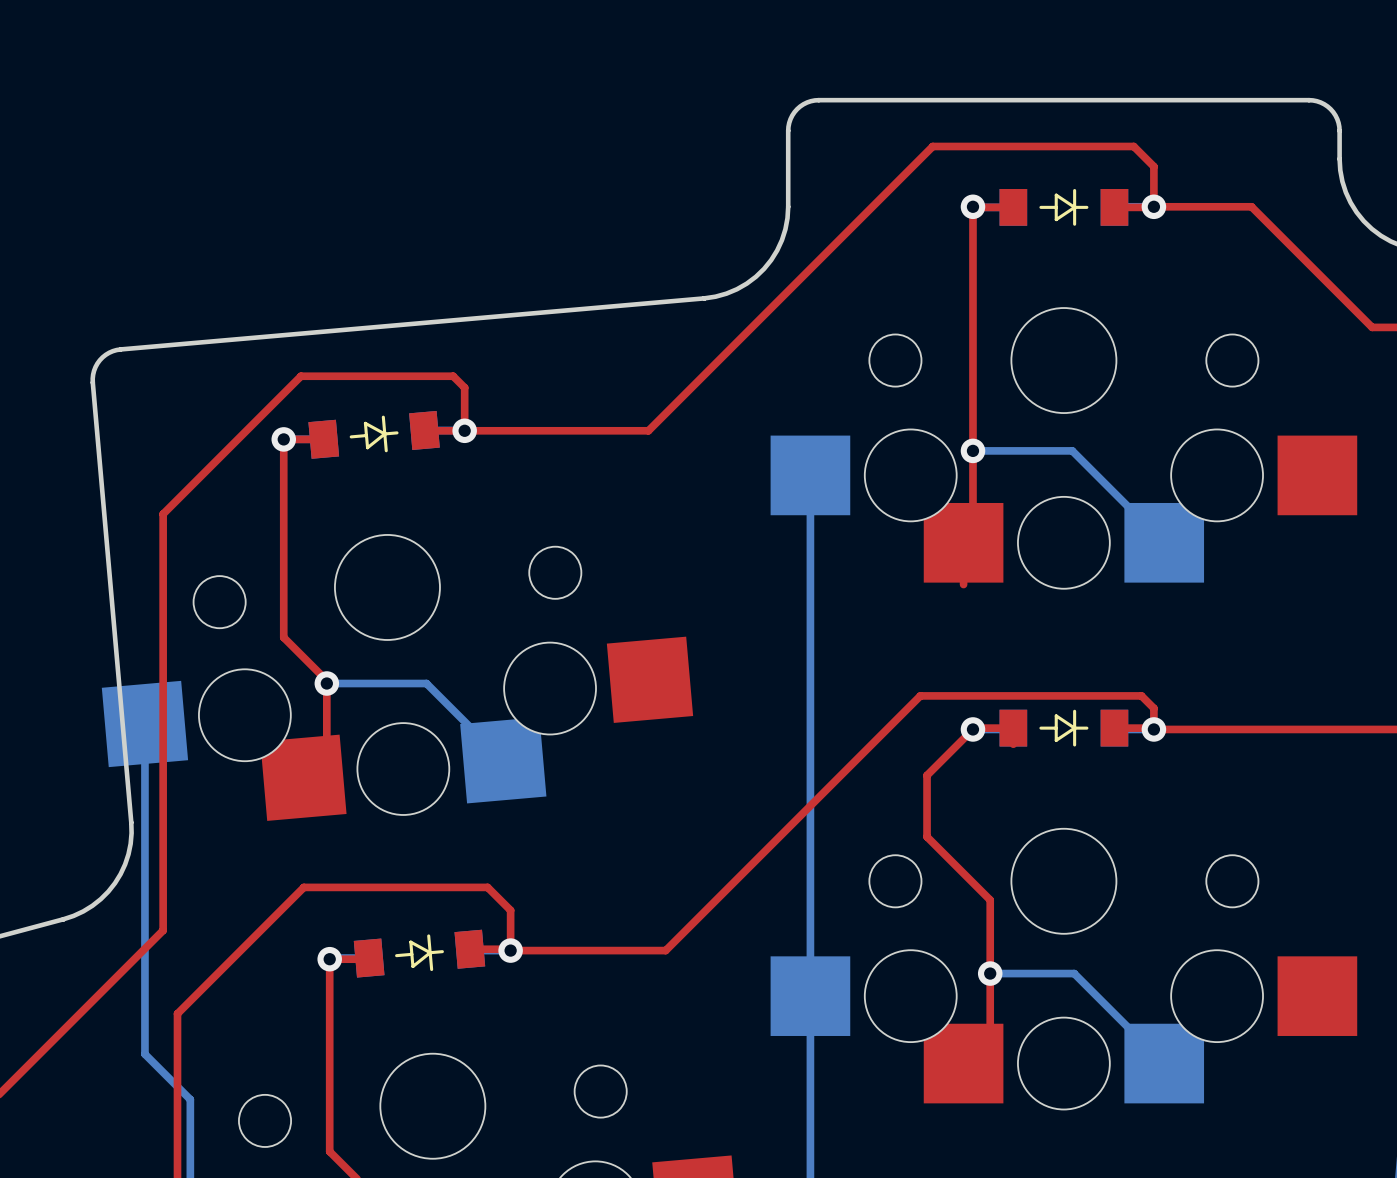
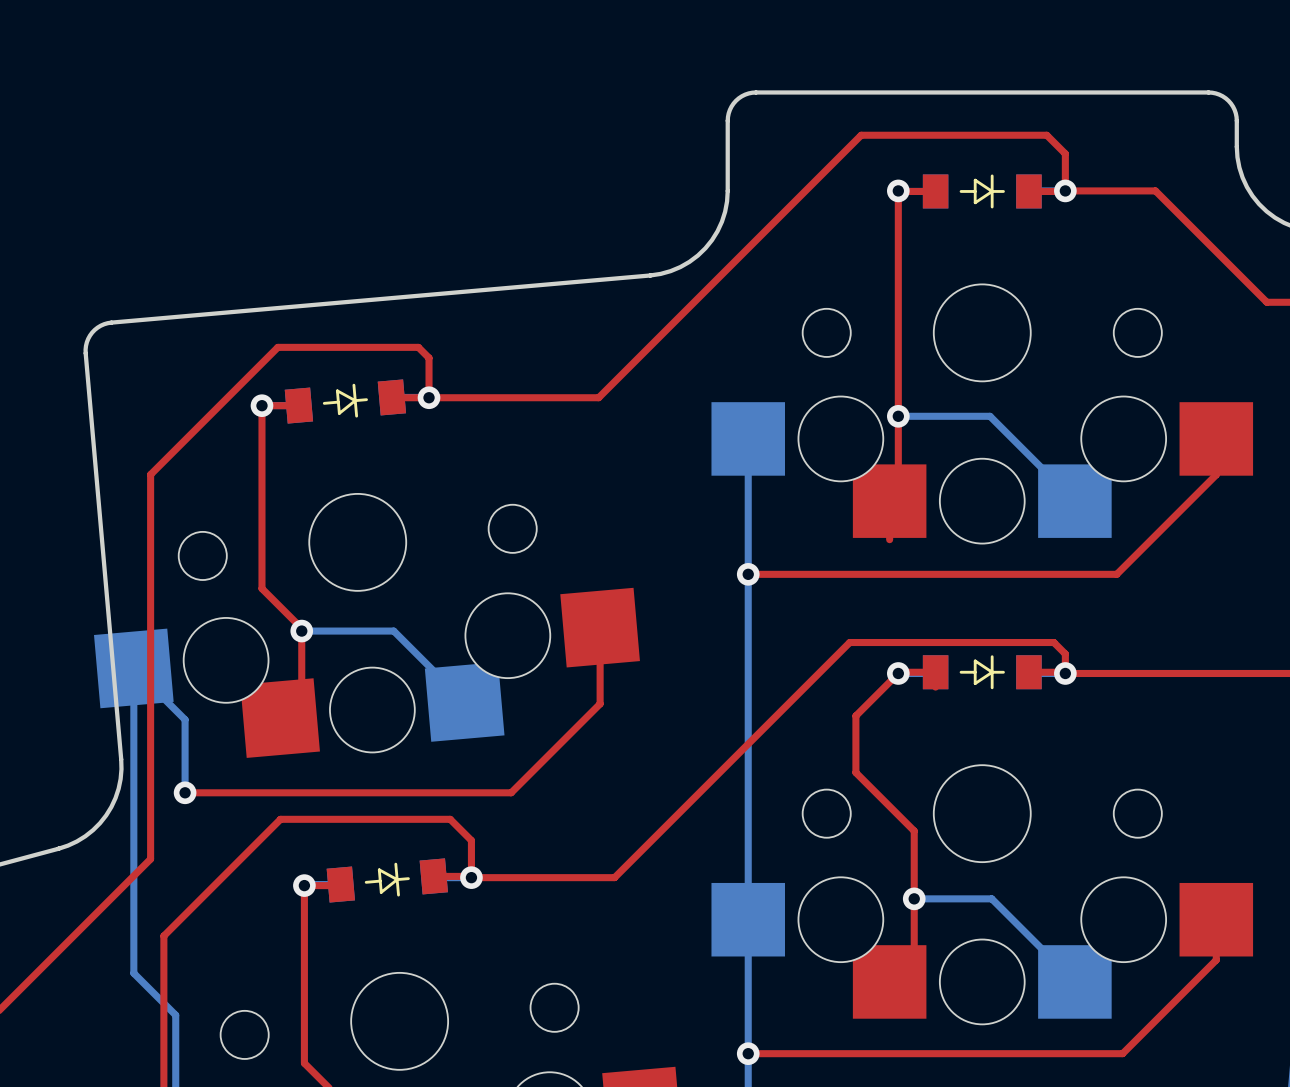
top track: none -> (1216, 438) (1216, 474) (1116, 574) (748, 574)
via: none -> (748, 574)
top track: none -> (600, 627) (600, 703) (511, 792) (185, 792)
bottom track: none -> (133, 668) (185, 719) (185, 792)
via: none -> (185, 792)
top track: none -> (1216, 919) (1216, 960) (1122, 1053) (748, 1053)
via: none -> (748, 1053)

